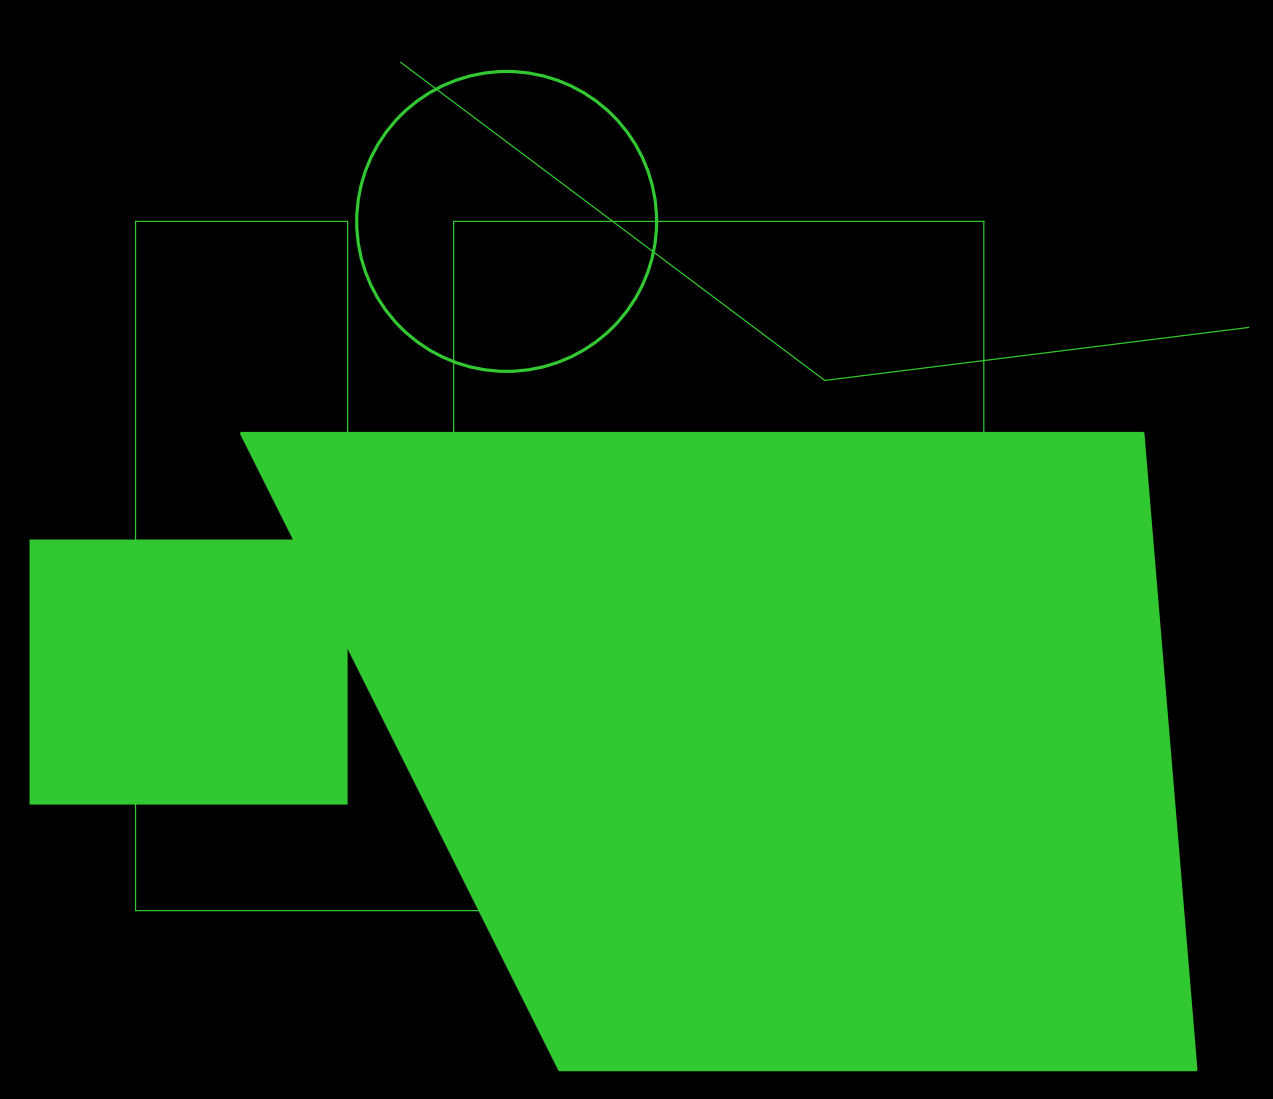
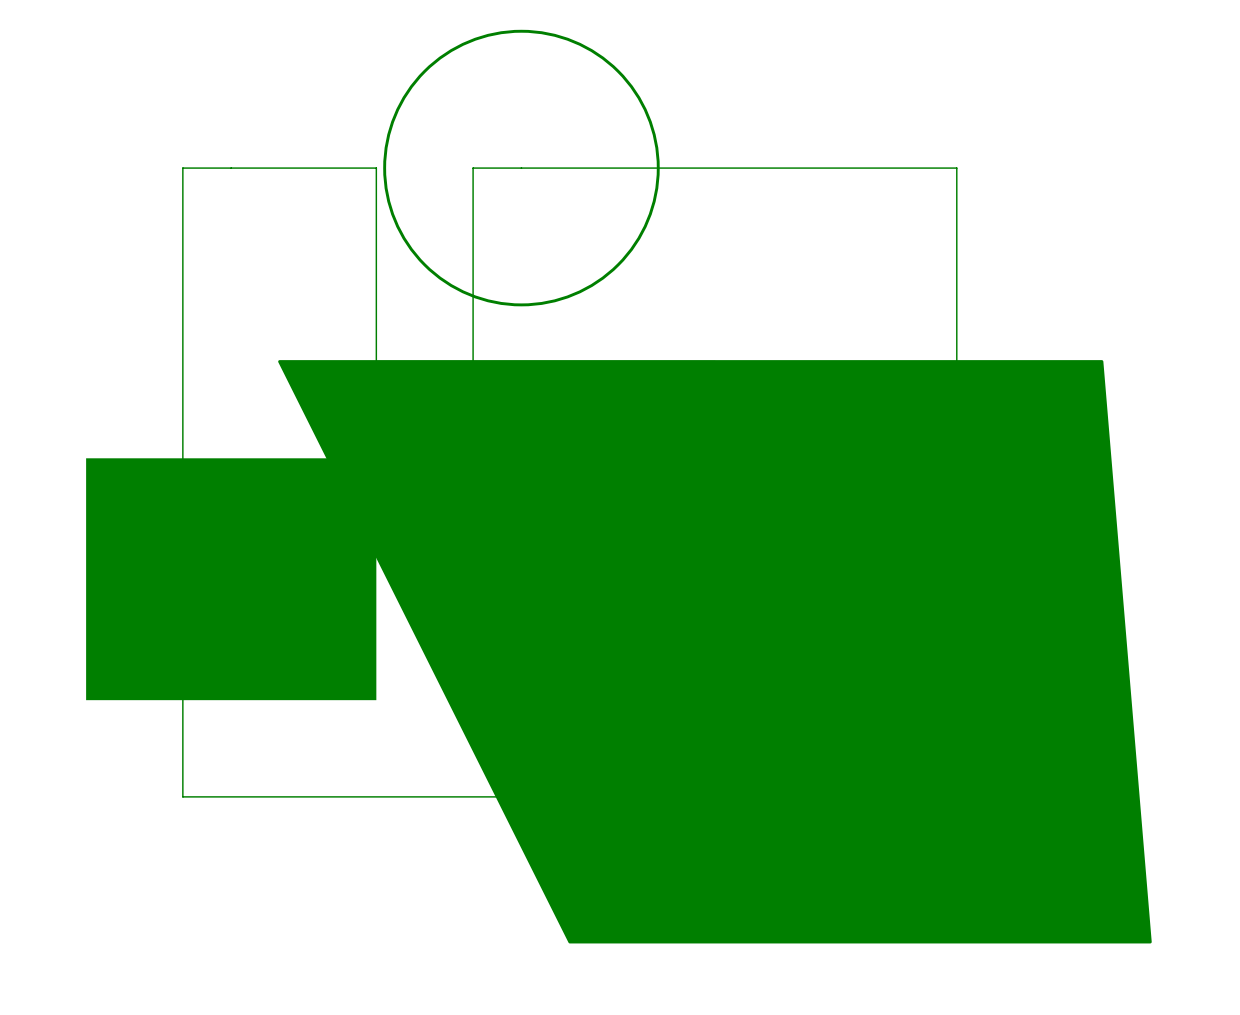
wire: (400, 62) (824, 380) (1248, 327) -> none

